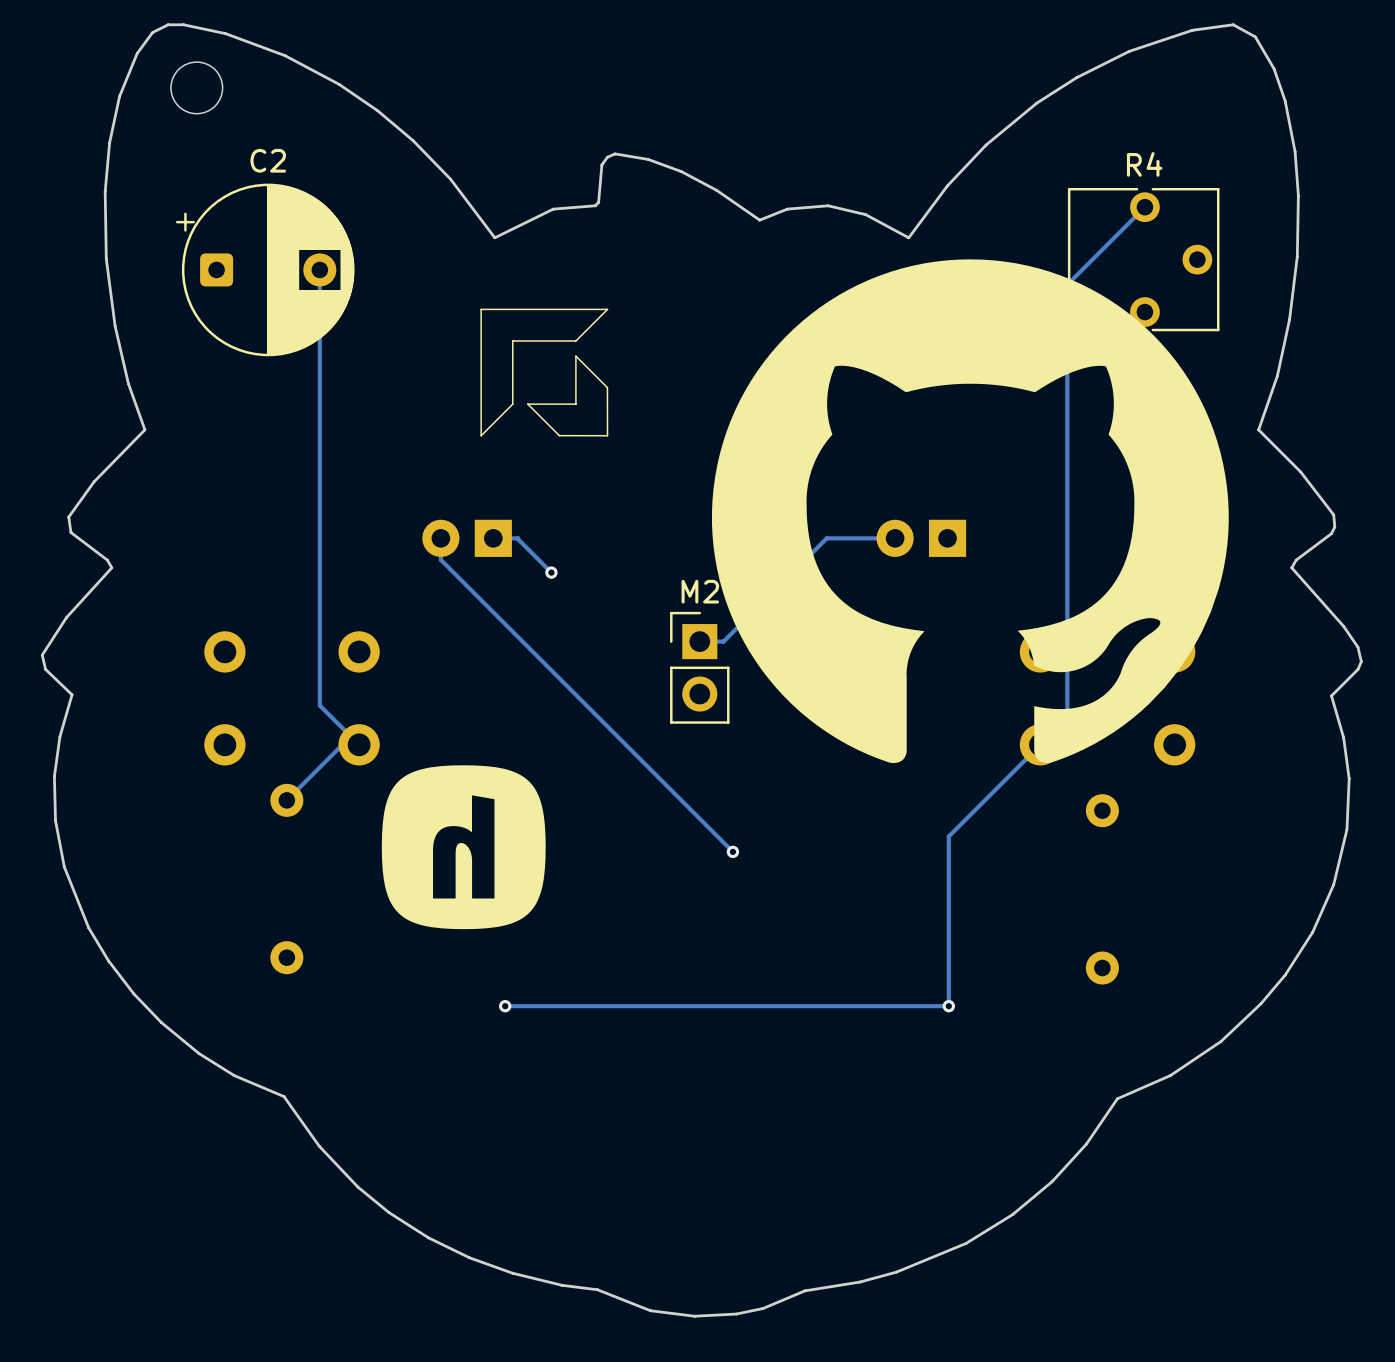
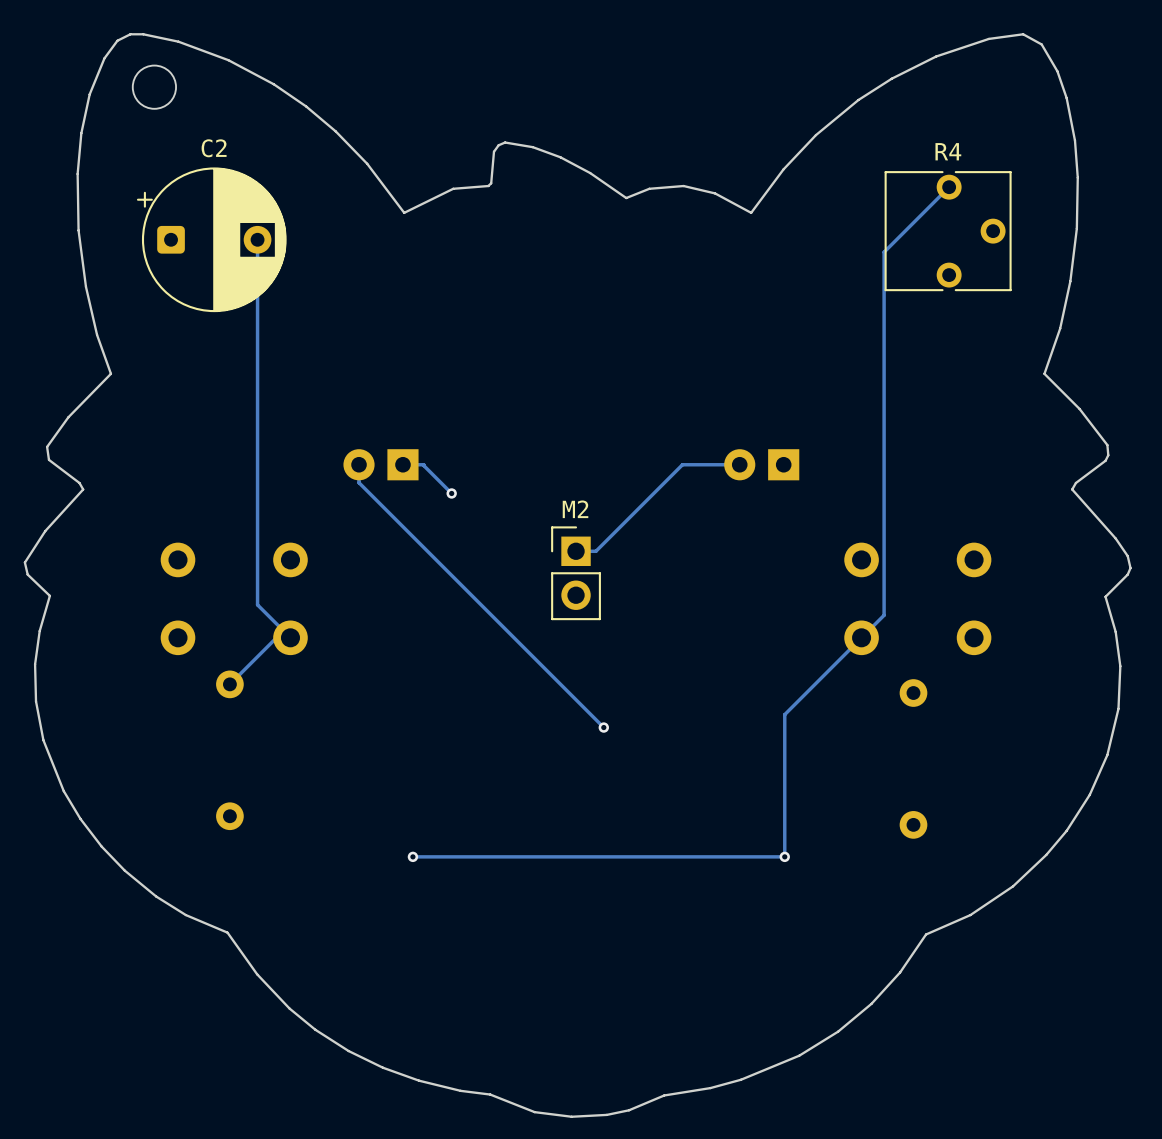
drawing: [711, 259, 1229, 764] -> none
line: (607, 309) (575, 340) (512, 340) (512, 404) (481, 435) (481, 309) (607, 309) -> none
line: (575, 356) (607, 387) (607, 435) (559, 435) (527, 404) (575, 404) (575, 356) -> none
drawing: [381, 765, 546, 930] -> none

